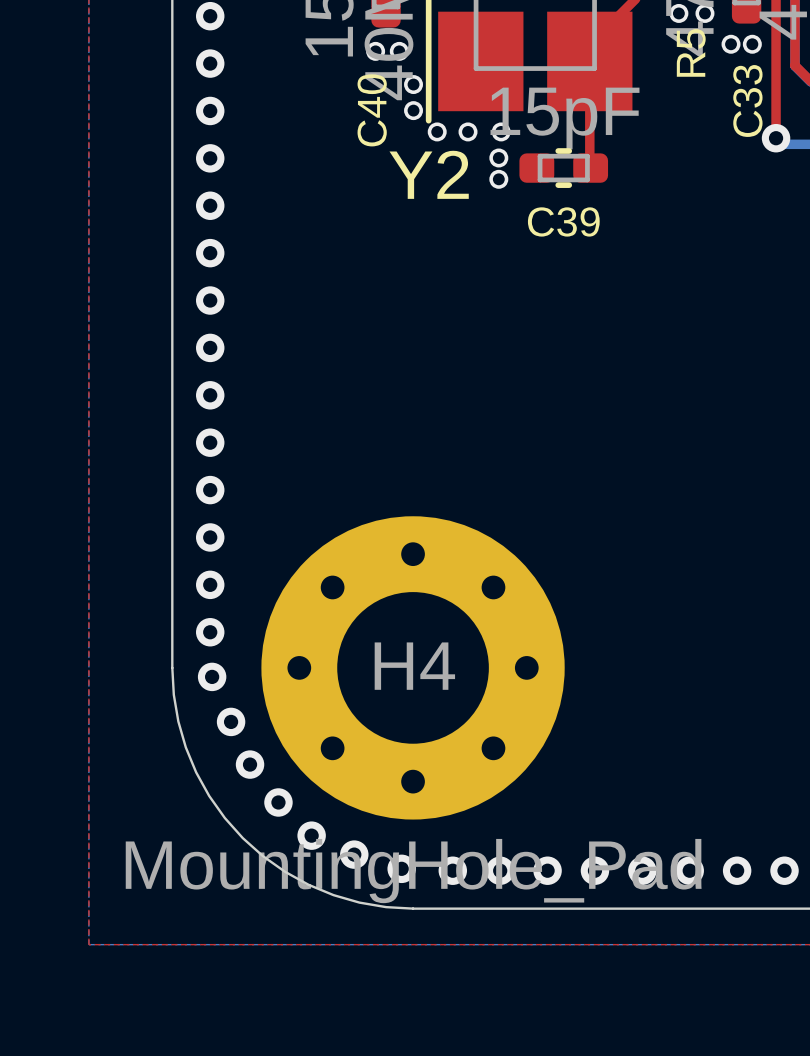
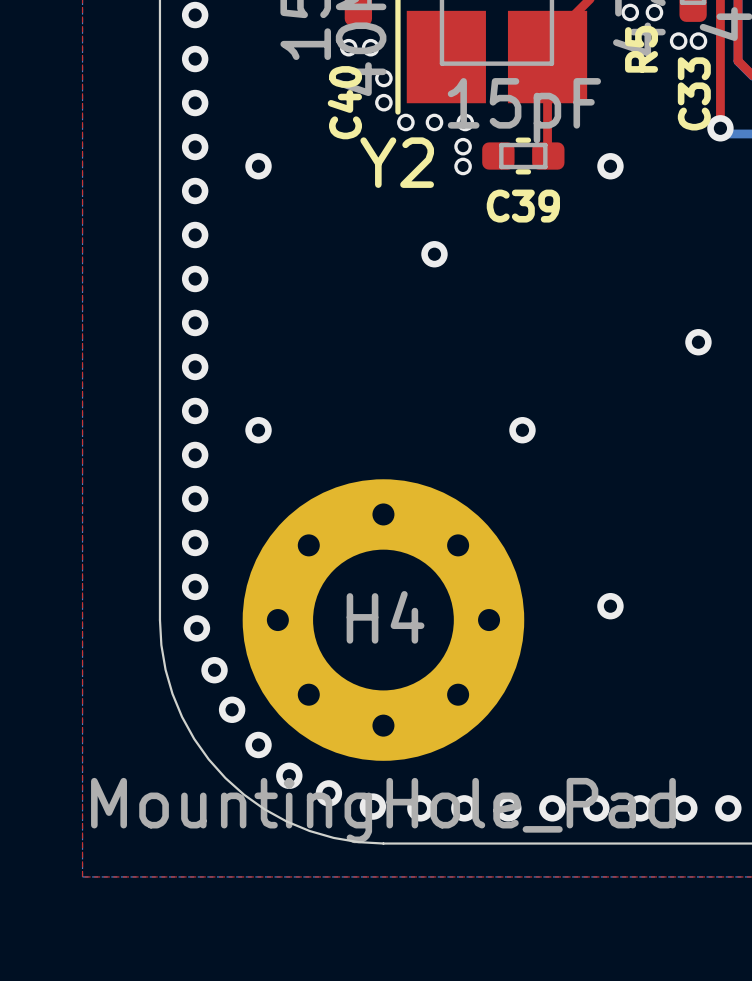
via: none -> (258, 166)
via: none -> (610, 166)
via: none -> (434, 254)
via: none -> (698, 342)
via: none -> (258, 430)
via: none -> (522, 430)
via: none -> (610, 606)

